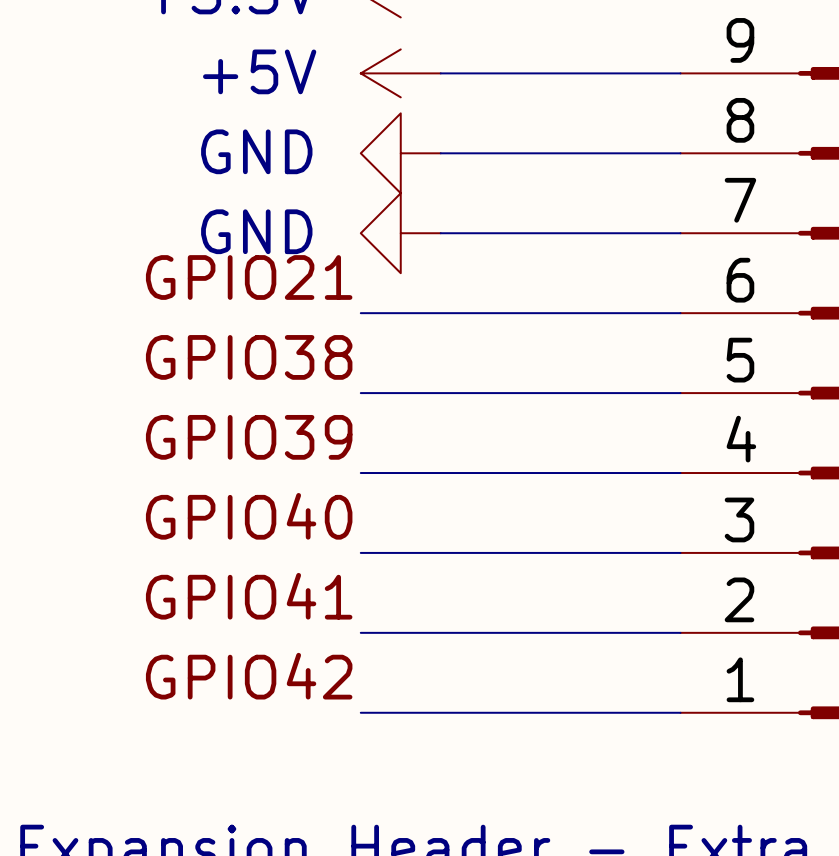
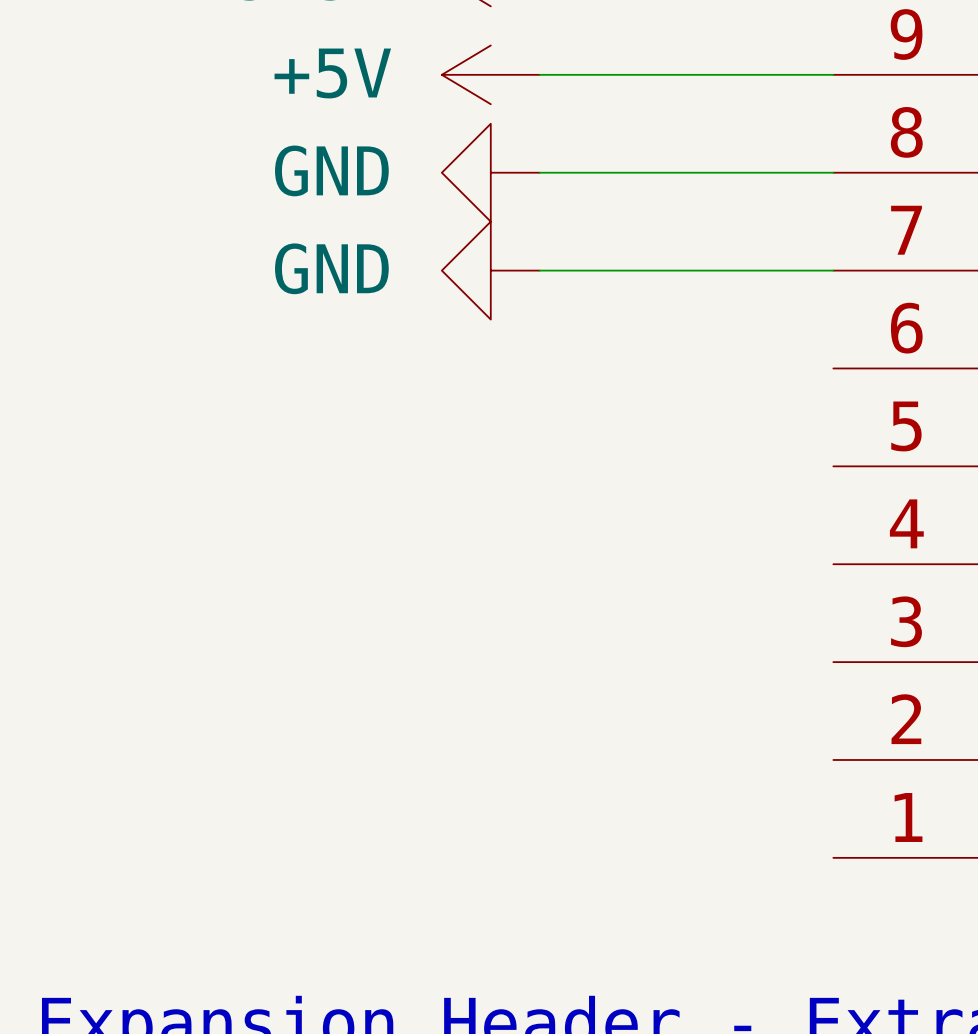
label: GPIO21 (249, 277) -> none
wire: (360, 313) (680, 313) -> none
label: GPIO38 (249, 357) -> none
wire: (360, 393) (680, 393) -> none
label: GPIO39 (249, 437) -> none
wire: (360, 473) (680, 473) -> none
label: GPIO40 (249, 516) -> none
wire: (360, 552) (680, 552) -> none
label: GPIO41 (249, 596) -> none
wire: (360, 632) (680, 632) -> none
label: GPIO42 (249, 676) -> none
wire: (360, 712) (680, 712) -> none

